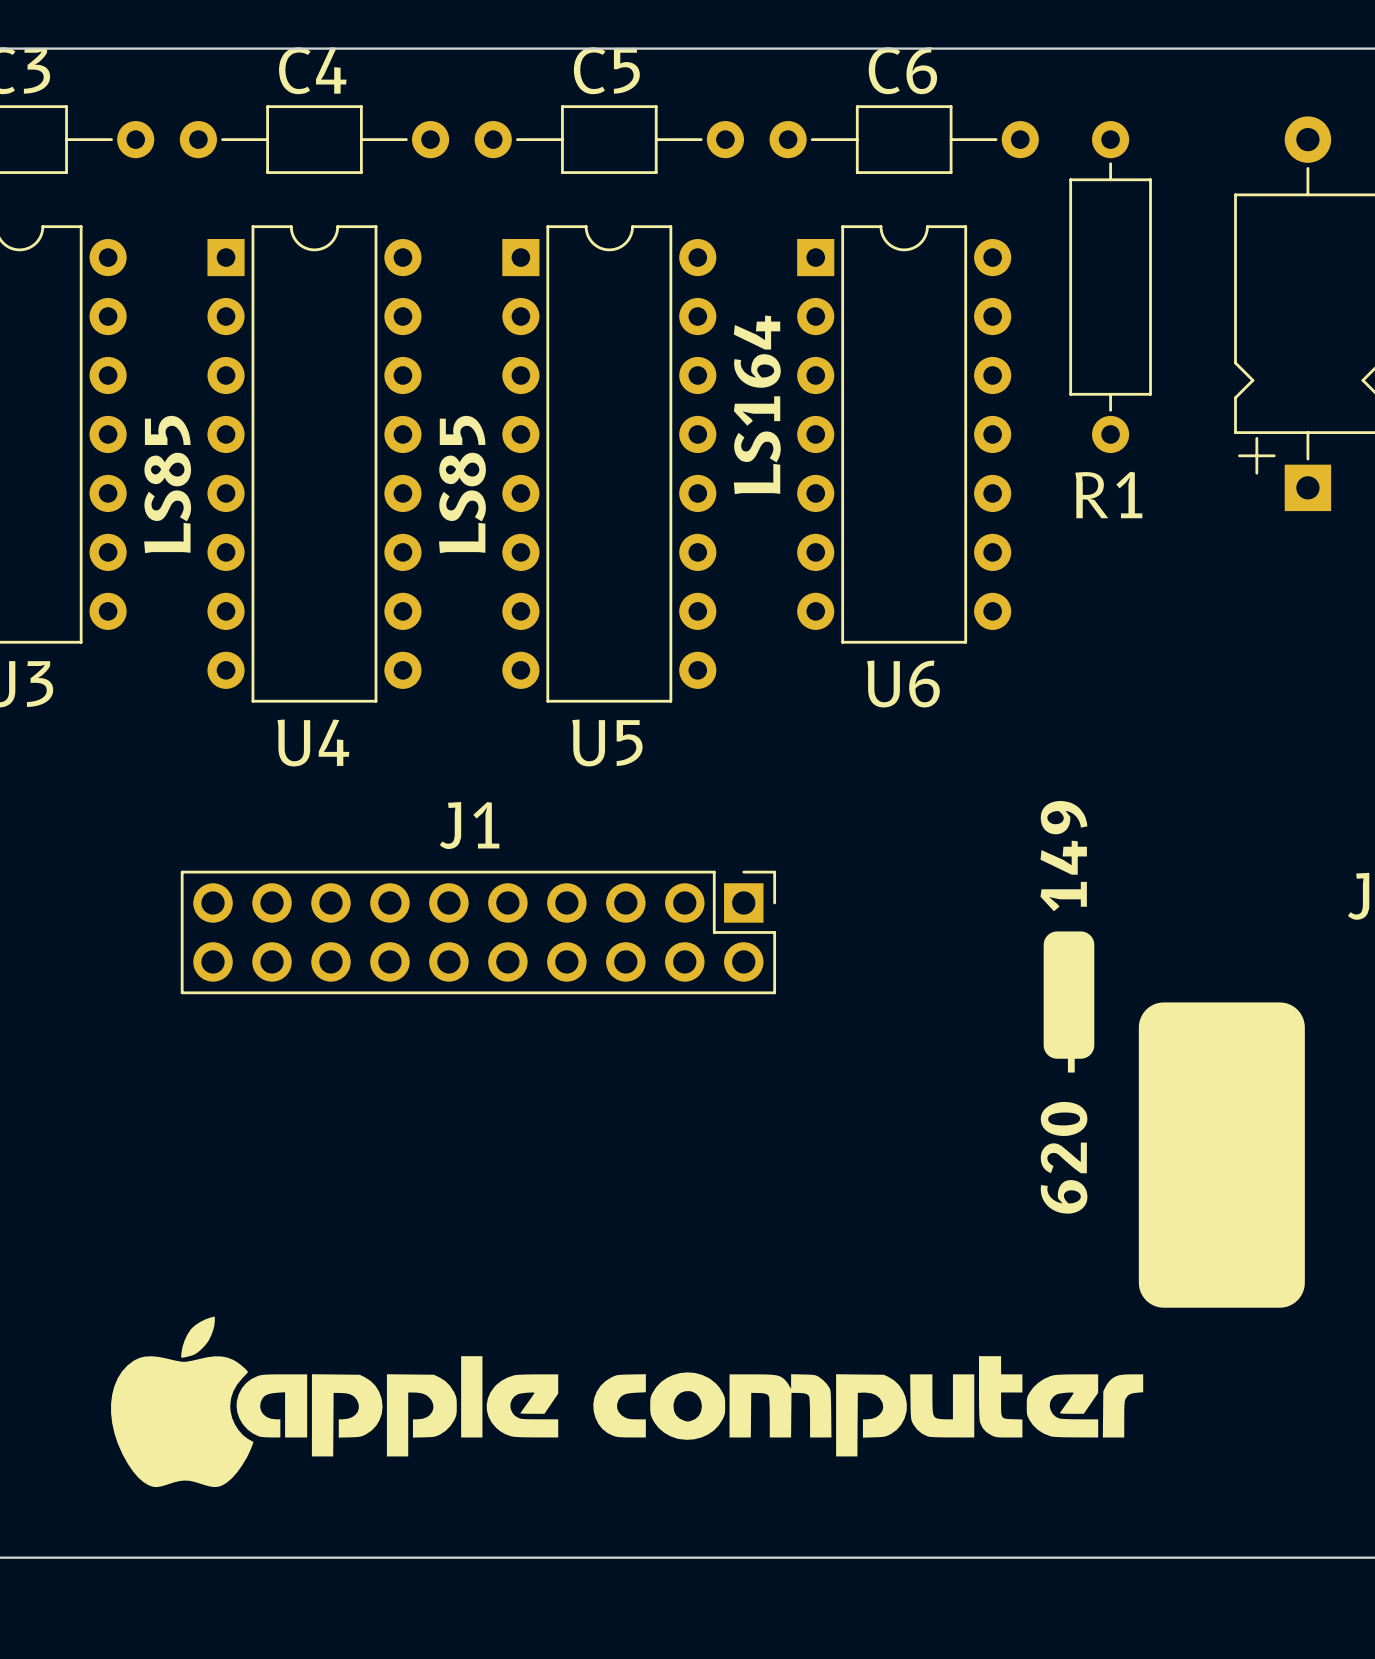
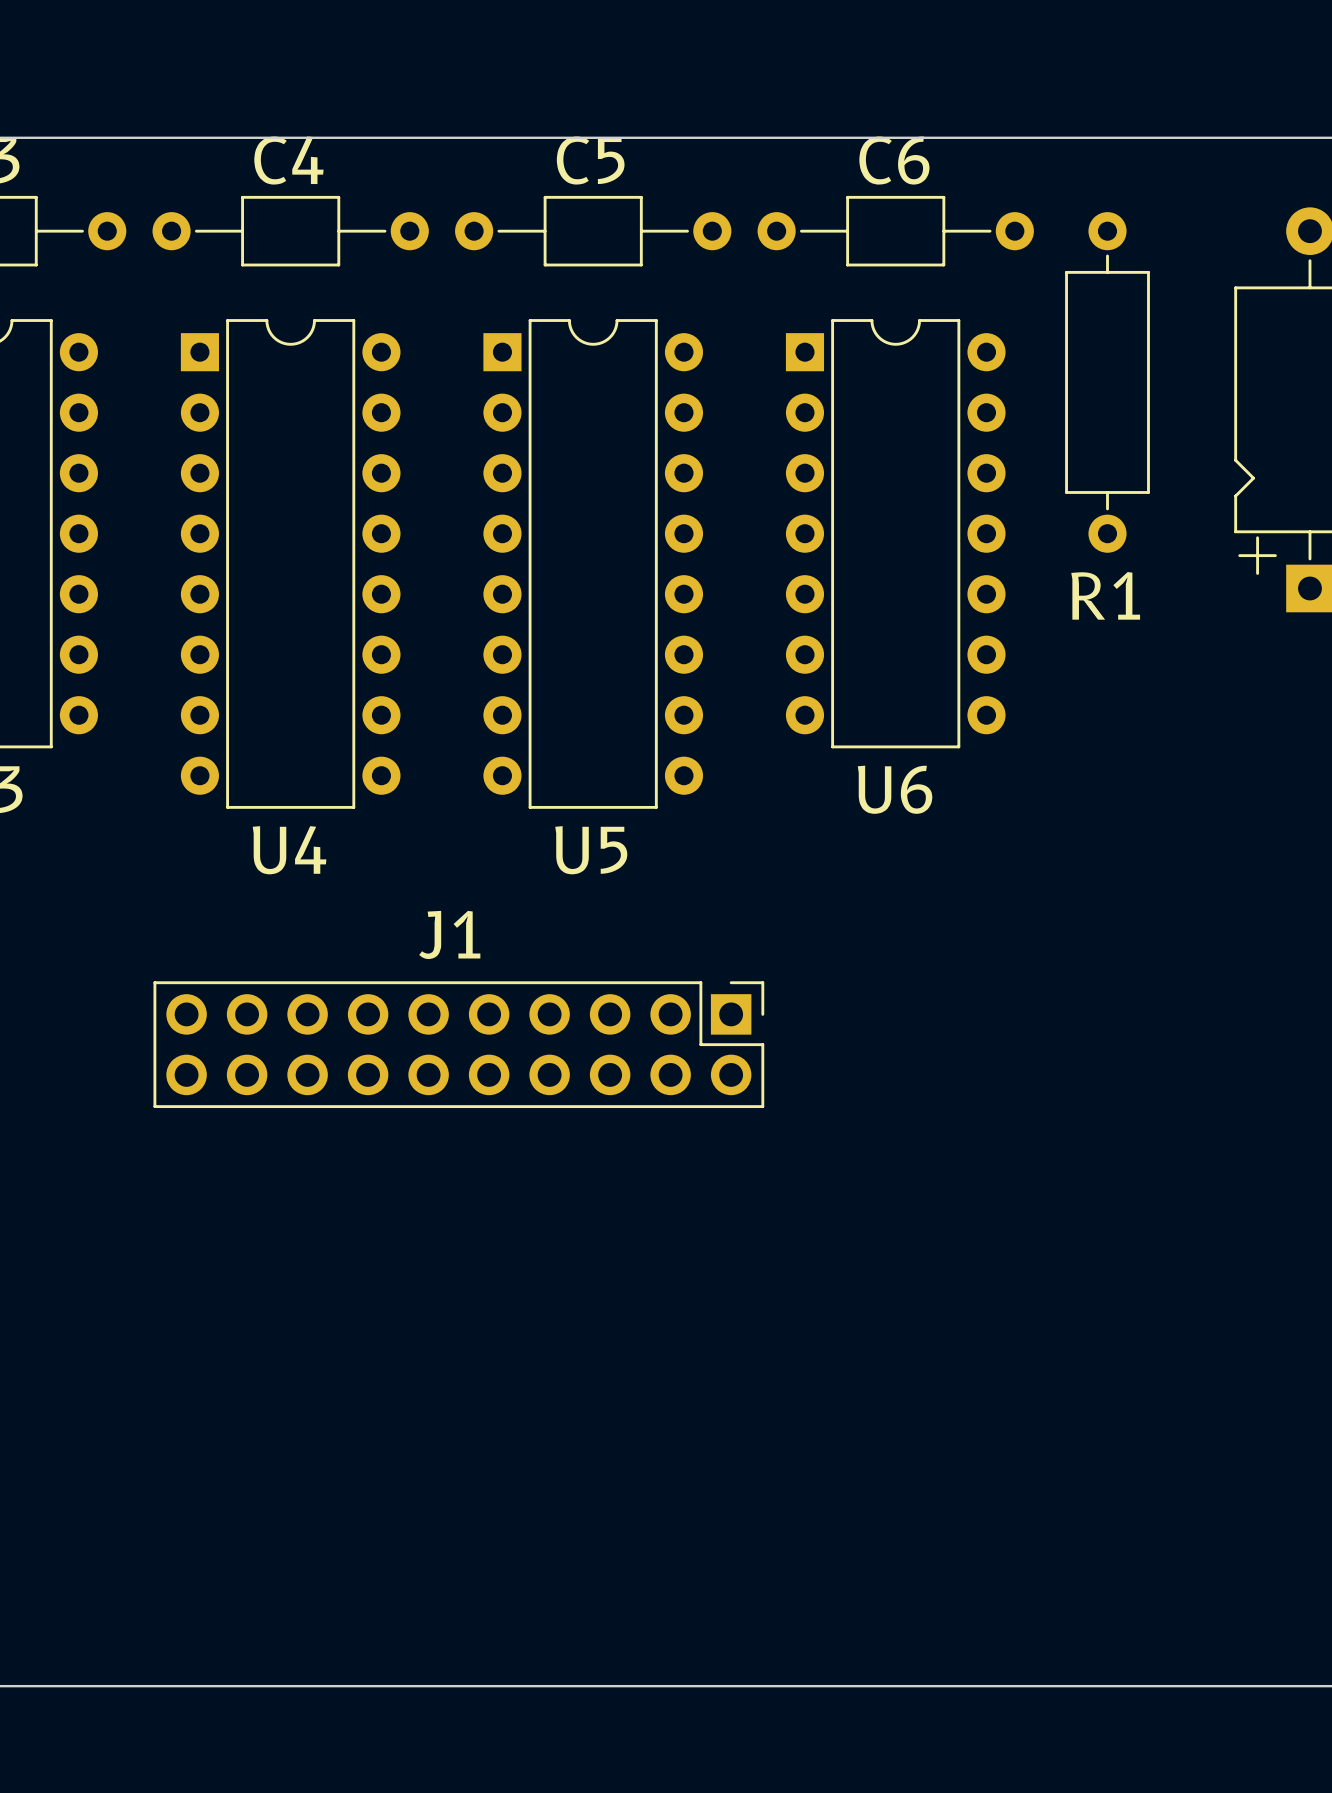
text: LS164 (757, 404) -> none
text: LS85 (167, 484) -> none
text: LS85 (462, 484) -> none
text: 149 (1063, 856) -> none
drawing: [1043, 931, 1095, 1059] -> none
drawing: [111, 1002, 1305, 1488] -> none
text: 620 - (1064, 1133) -> none

